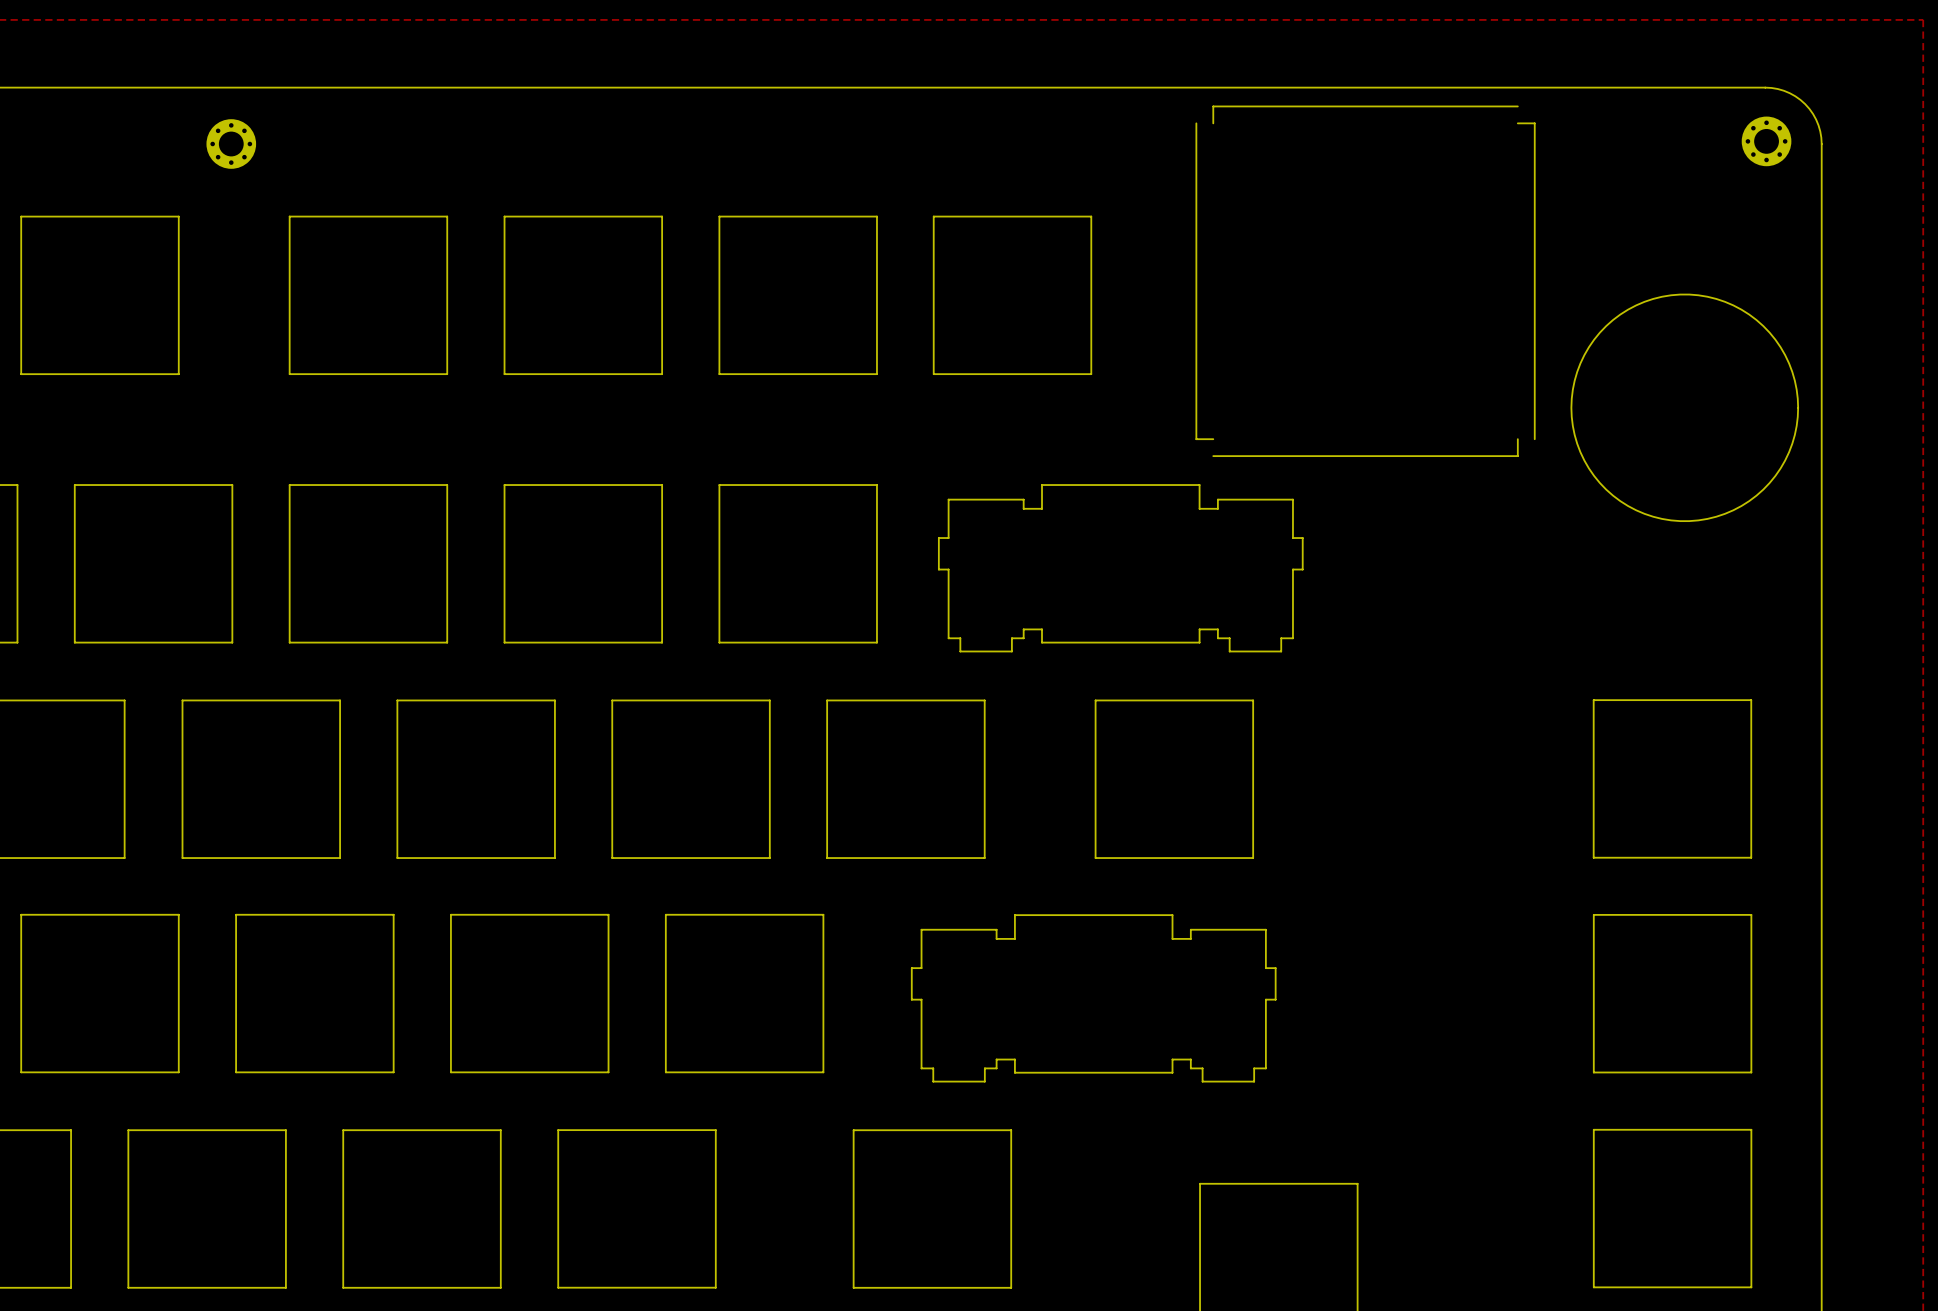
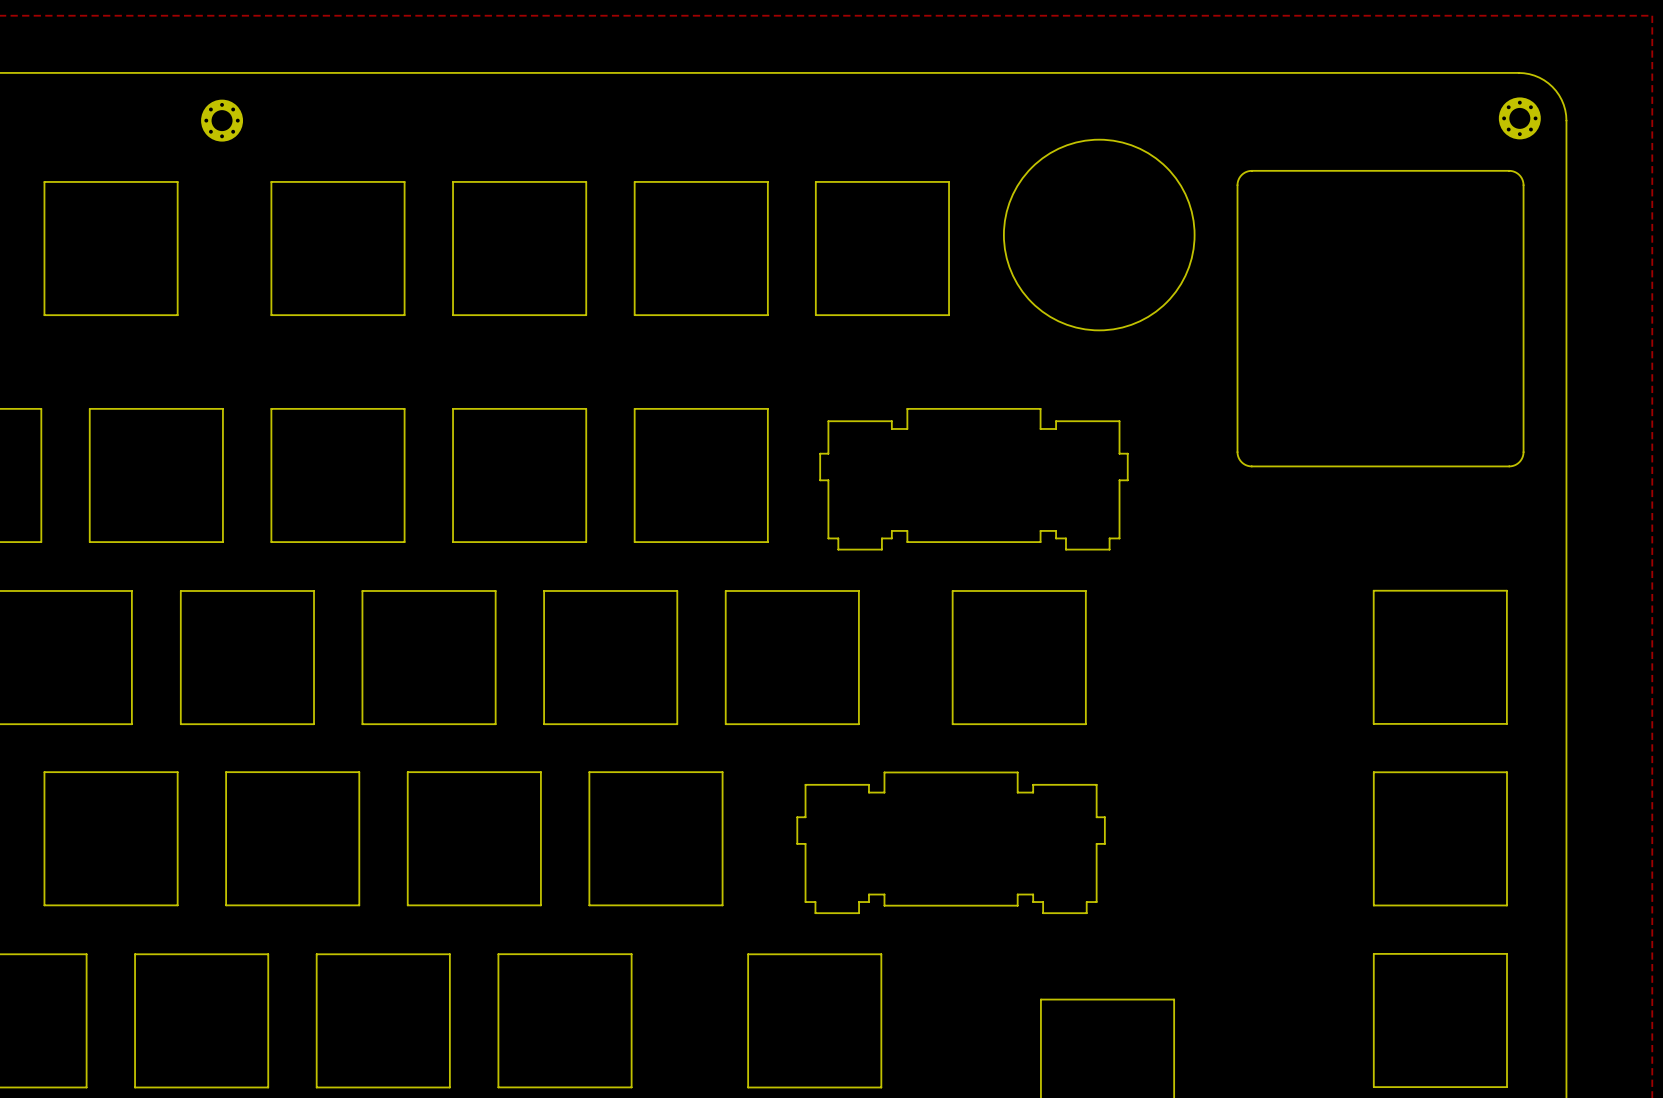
board edge: (1517, 106) (1213, 106) (1213, 123) -> none
board edge: (1196, 123) (1196, 439) (1213, 439) -> none
board edge: (1517, 123) (1534, 123) (1534, 439) -> none
round board edge: none -> [1003, 139, 1195, 331]
board edge: none -> (1251, 170) (1509, 170) (1519, 175) (1523, 185) (1523, 452) (1519, 462) (1509, 466) (1251, 466) (1241, 462) (1237, 452) (1237, 185) (1241, 175) (1251, 170)
board edge: (1798, 407) (1794, 434) (1789, 452) (1775, 475) (1763, 489) (1733, 510) (1716, 516) (1689, 521) (1671, 520) (1644, 513) (1628, 506) (1606, 489) (1594, 475) (1580, 452) (1574, 434) (1571, 407) (1574, 380) (1580, 363) (1594, 339) (1606, 326) (1636, 305) (1653, 298) (1680, 294) (1698, 295) (1724, 301) (1741, 309) (1763, 326) (1775, 339) (1789, 363) (1794, 380) (1798, 407) -> none
board edge: (1517, 439) (1517, 456) (1213, 456) -> none

